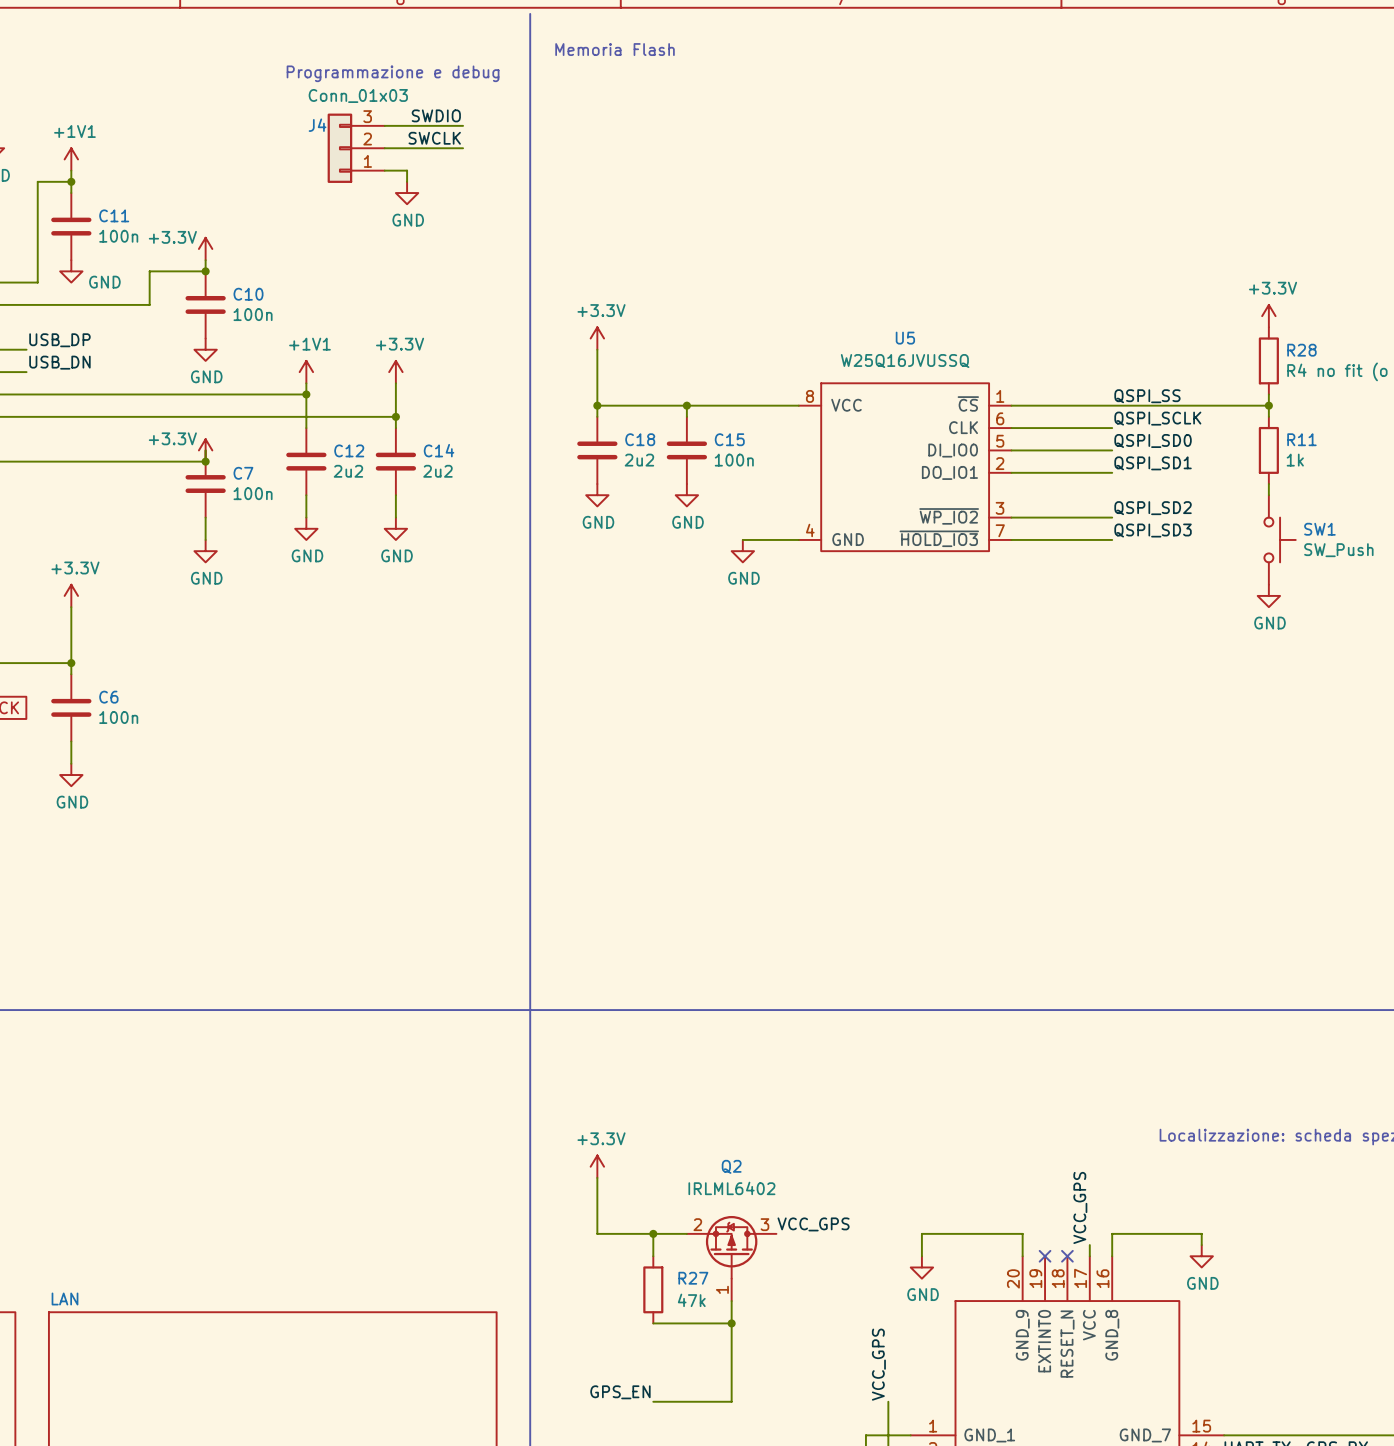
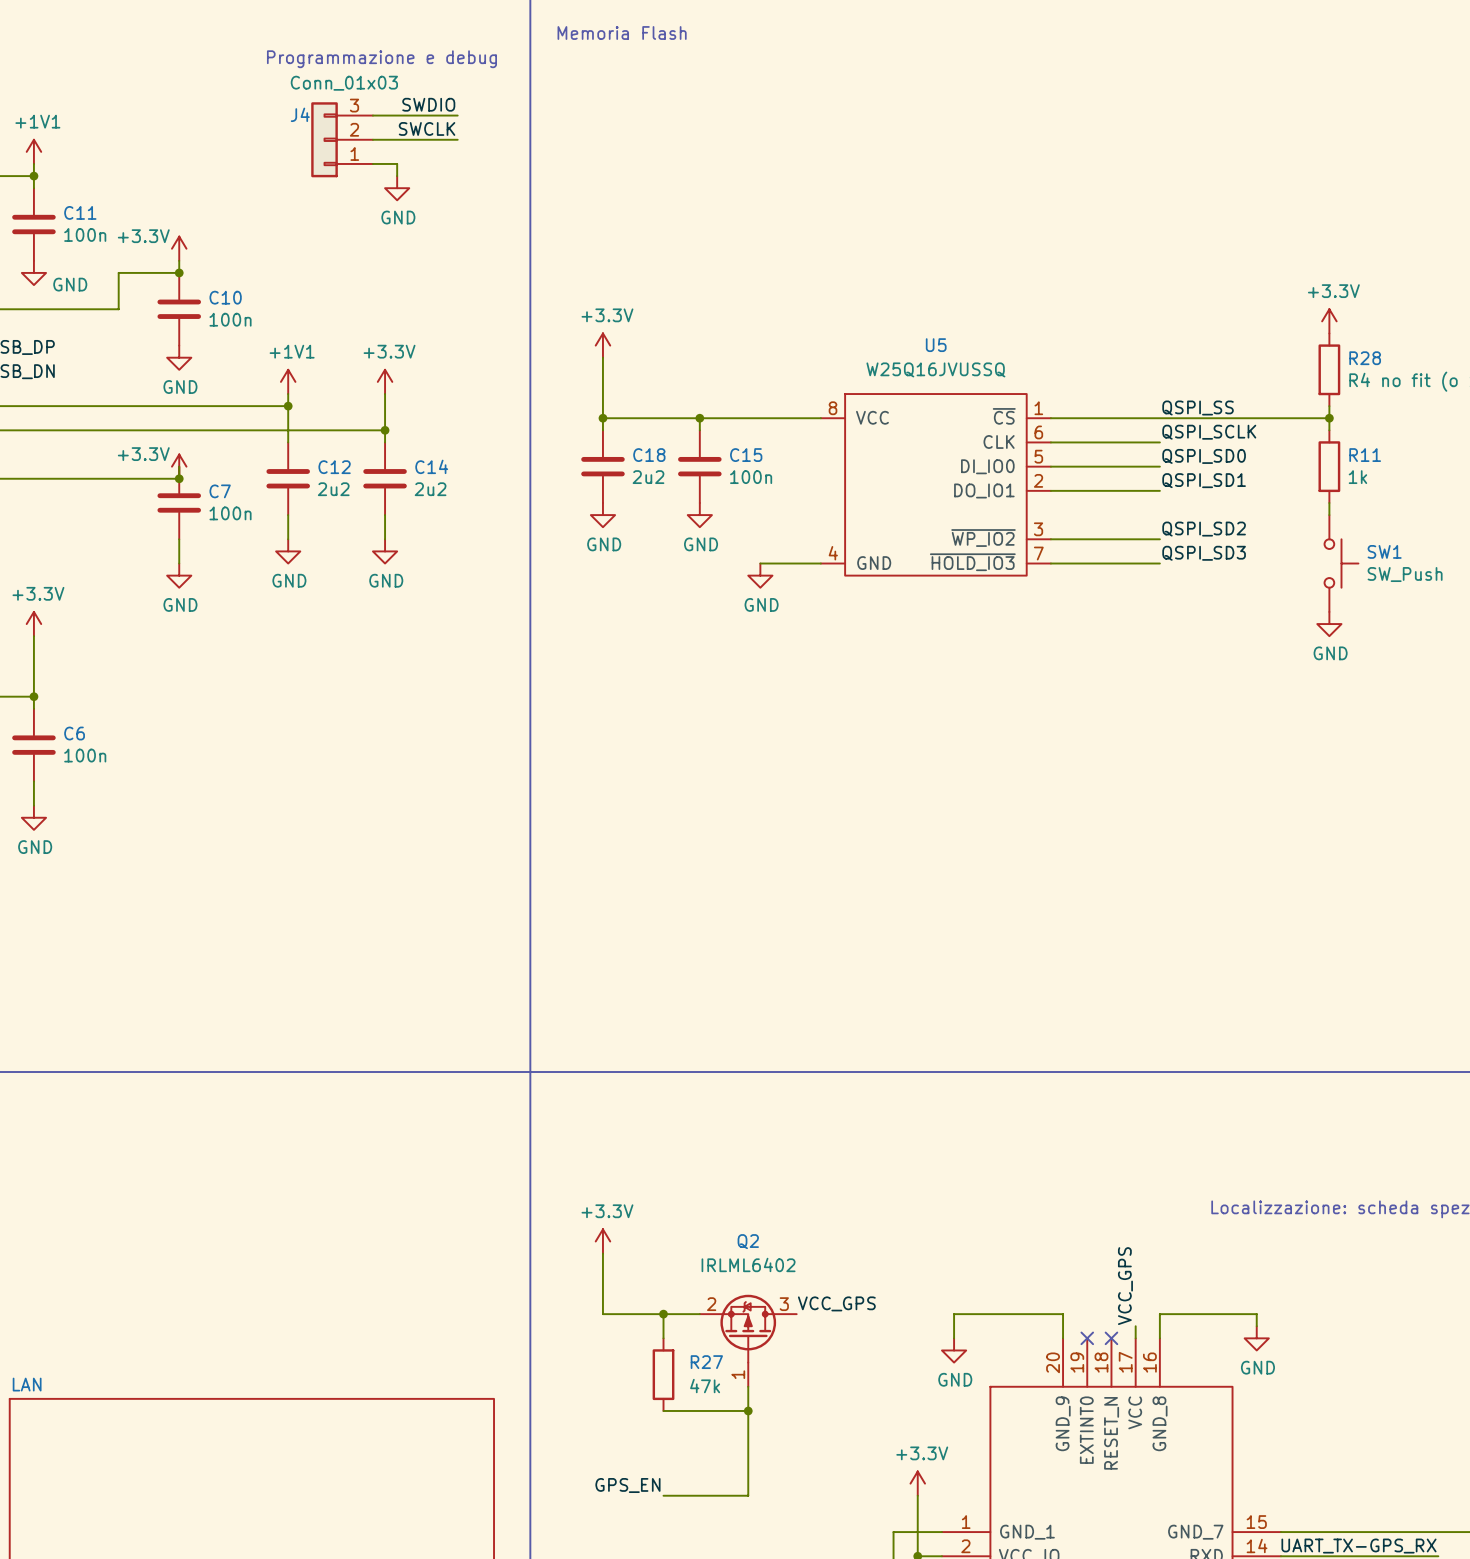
label: VCC_GPS (878, 1364) -> none
power symbol: none -> +3.3V (917, 1483)

